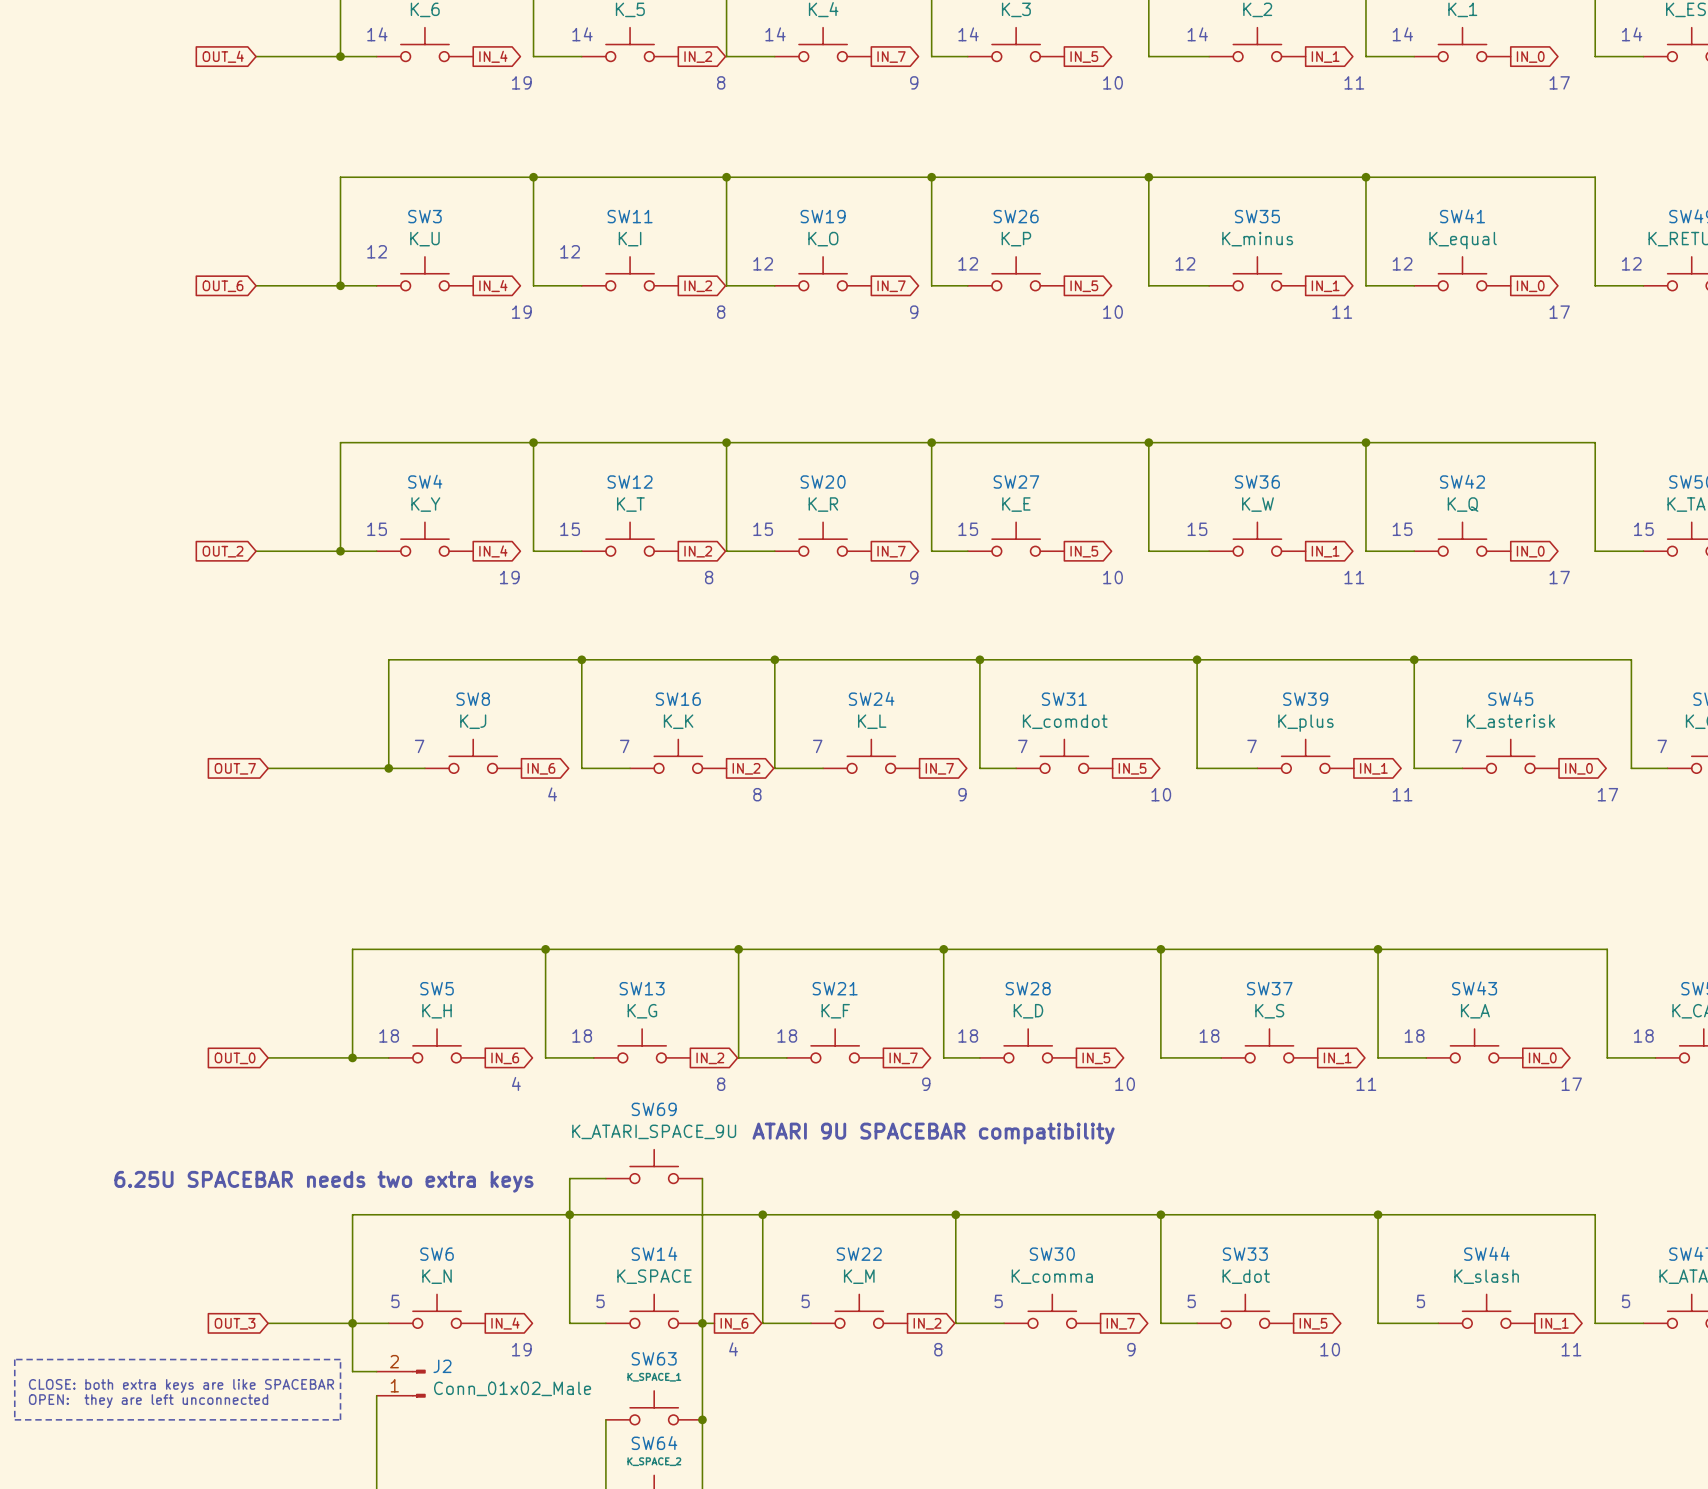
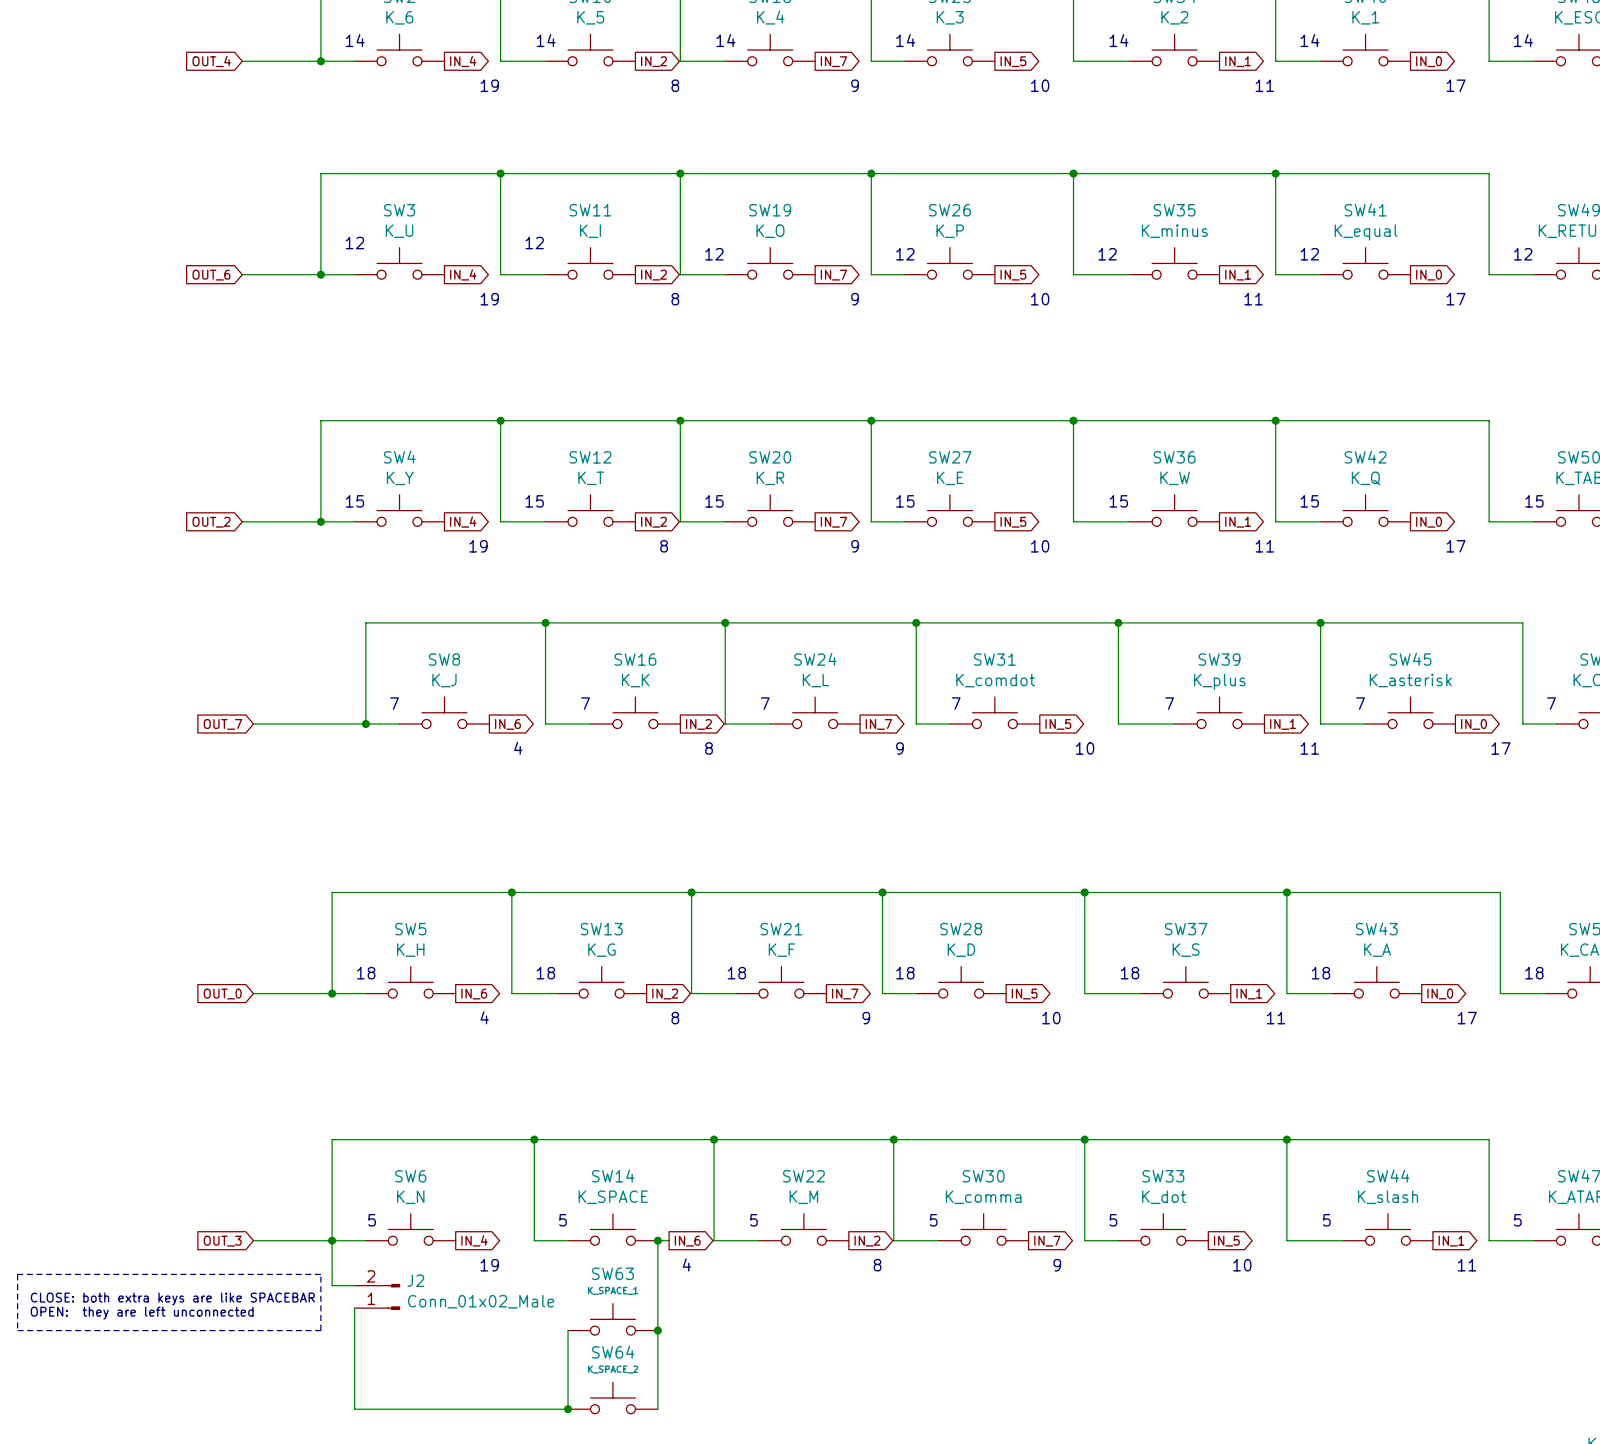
text: ATARI 9U SPACEBAR compatibility (933, 1133) -> none
SW69: K_ATARI_SPACE_9U (654, 1166) -> none
wire: (605, 1178) (569, 1178) (569, 1214) -> none
wire: (702, 1178) (702, 1323) -> none
text: 6.25U SPACEBAR needs two extra keys (323, 1181) -> none

